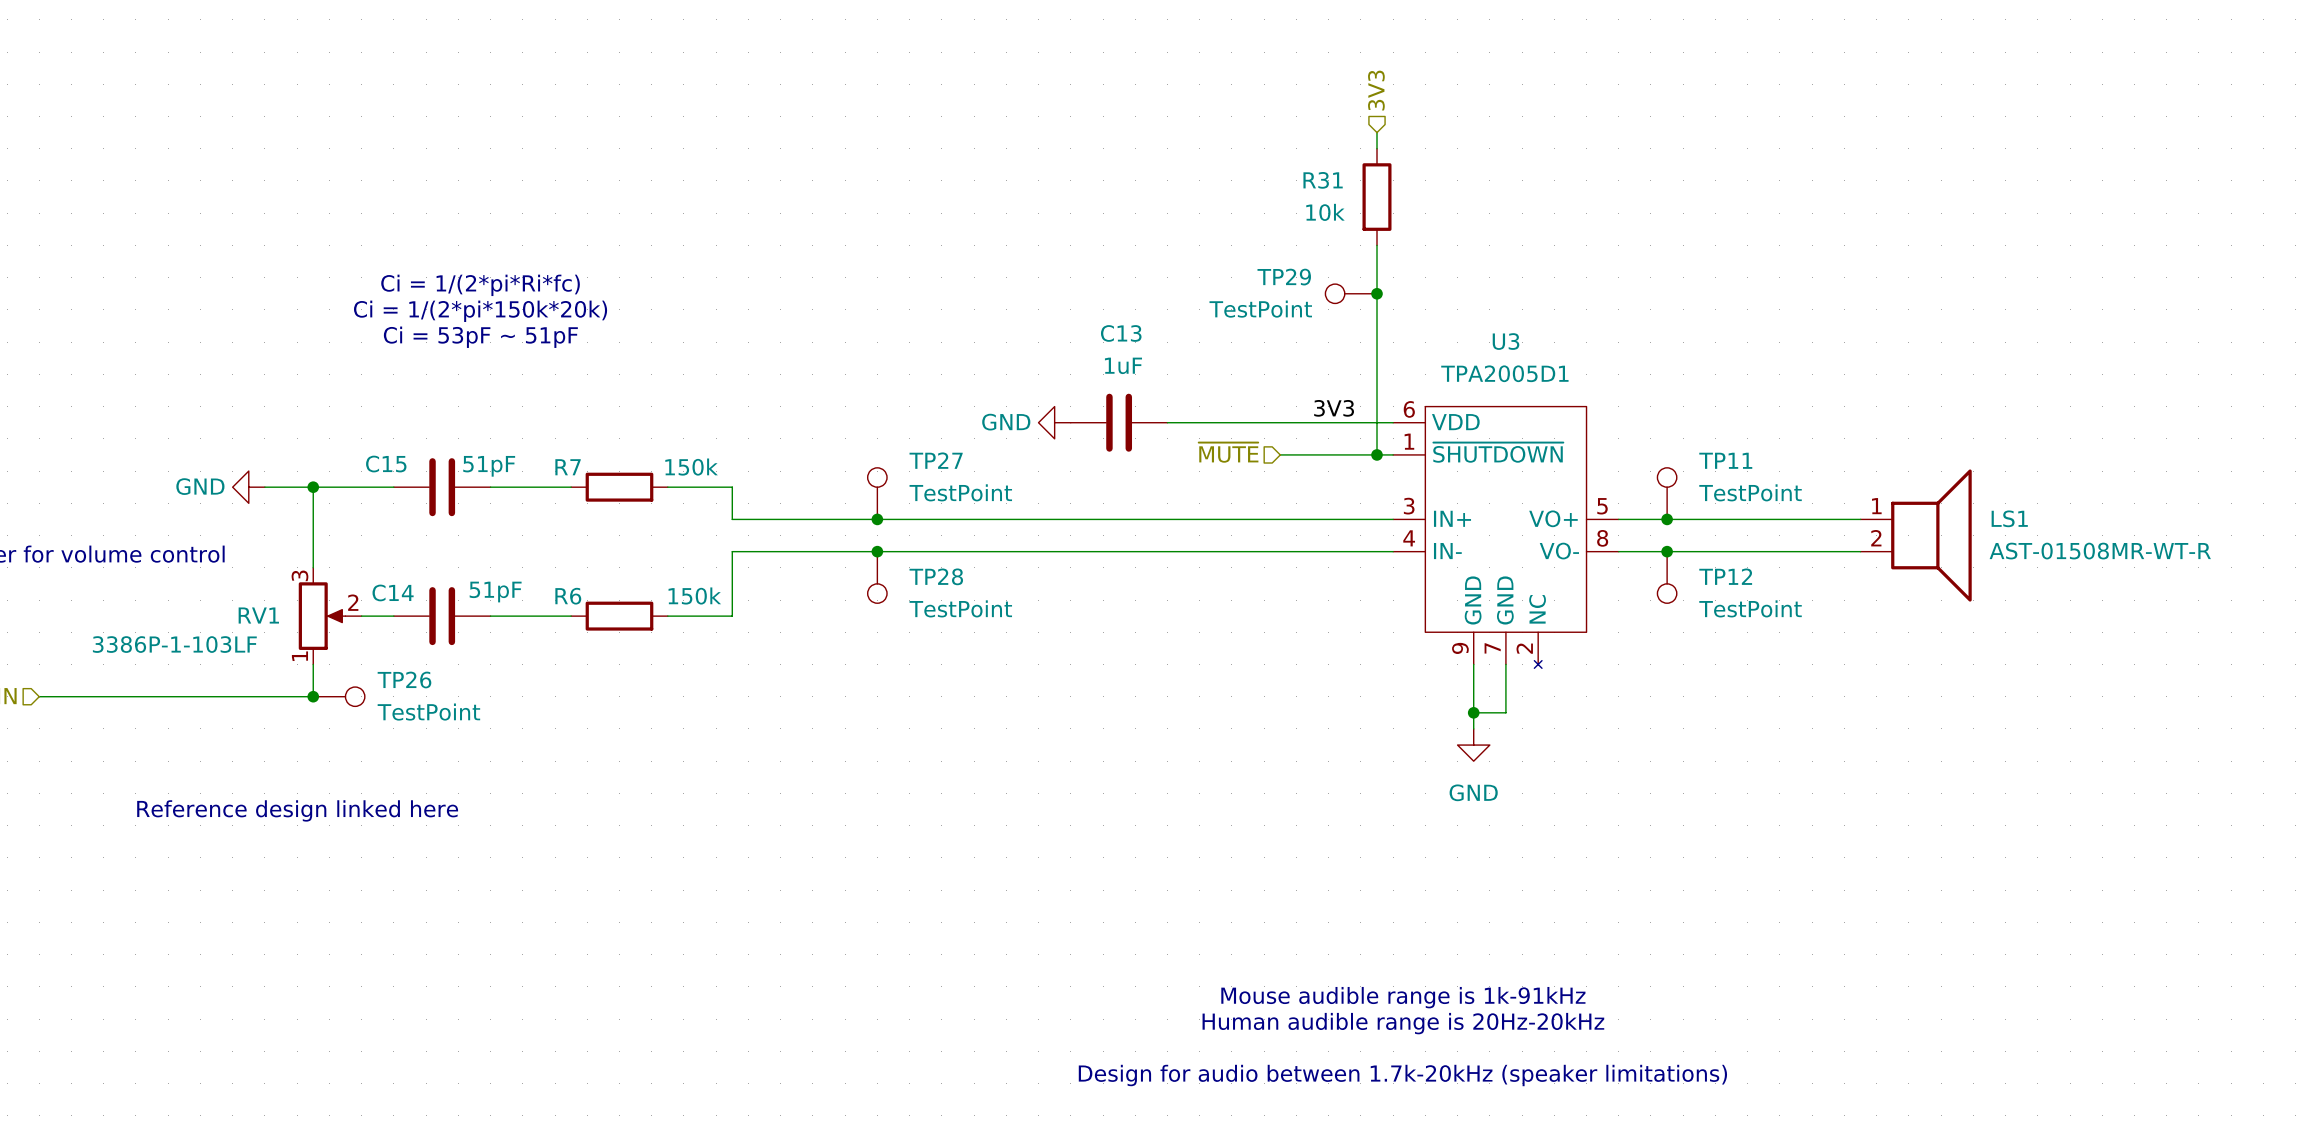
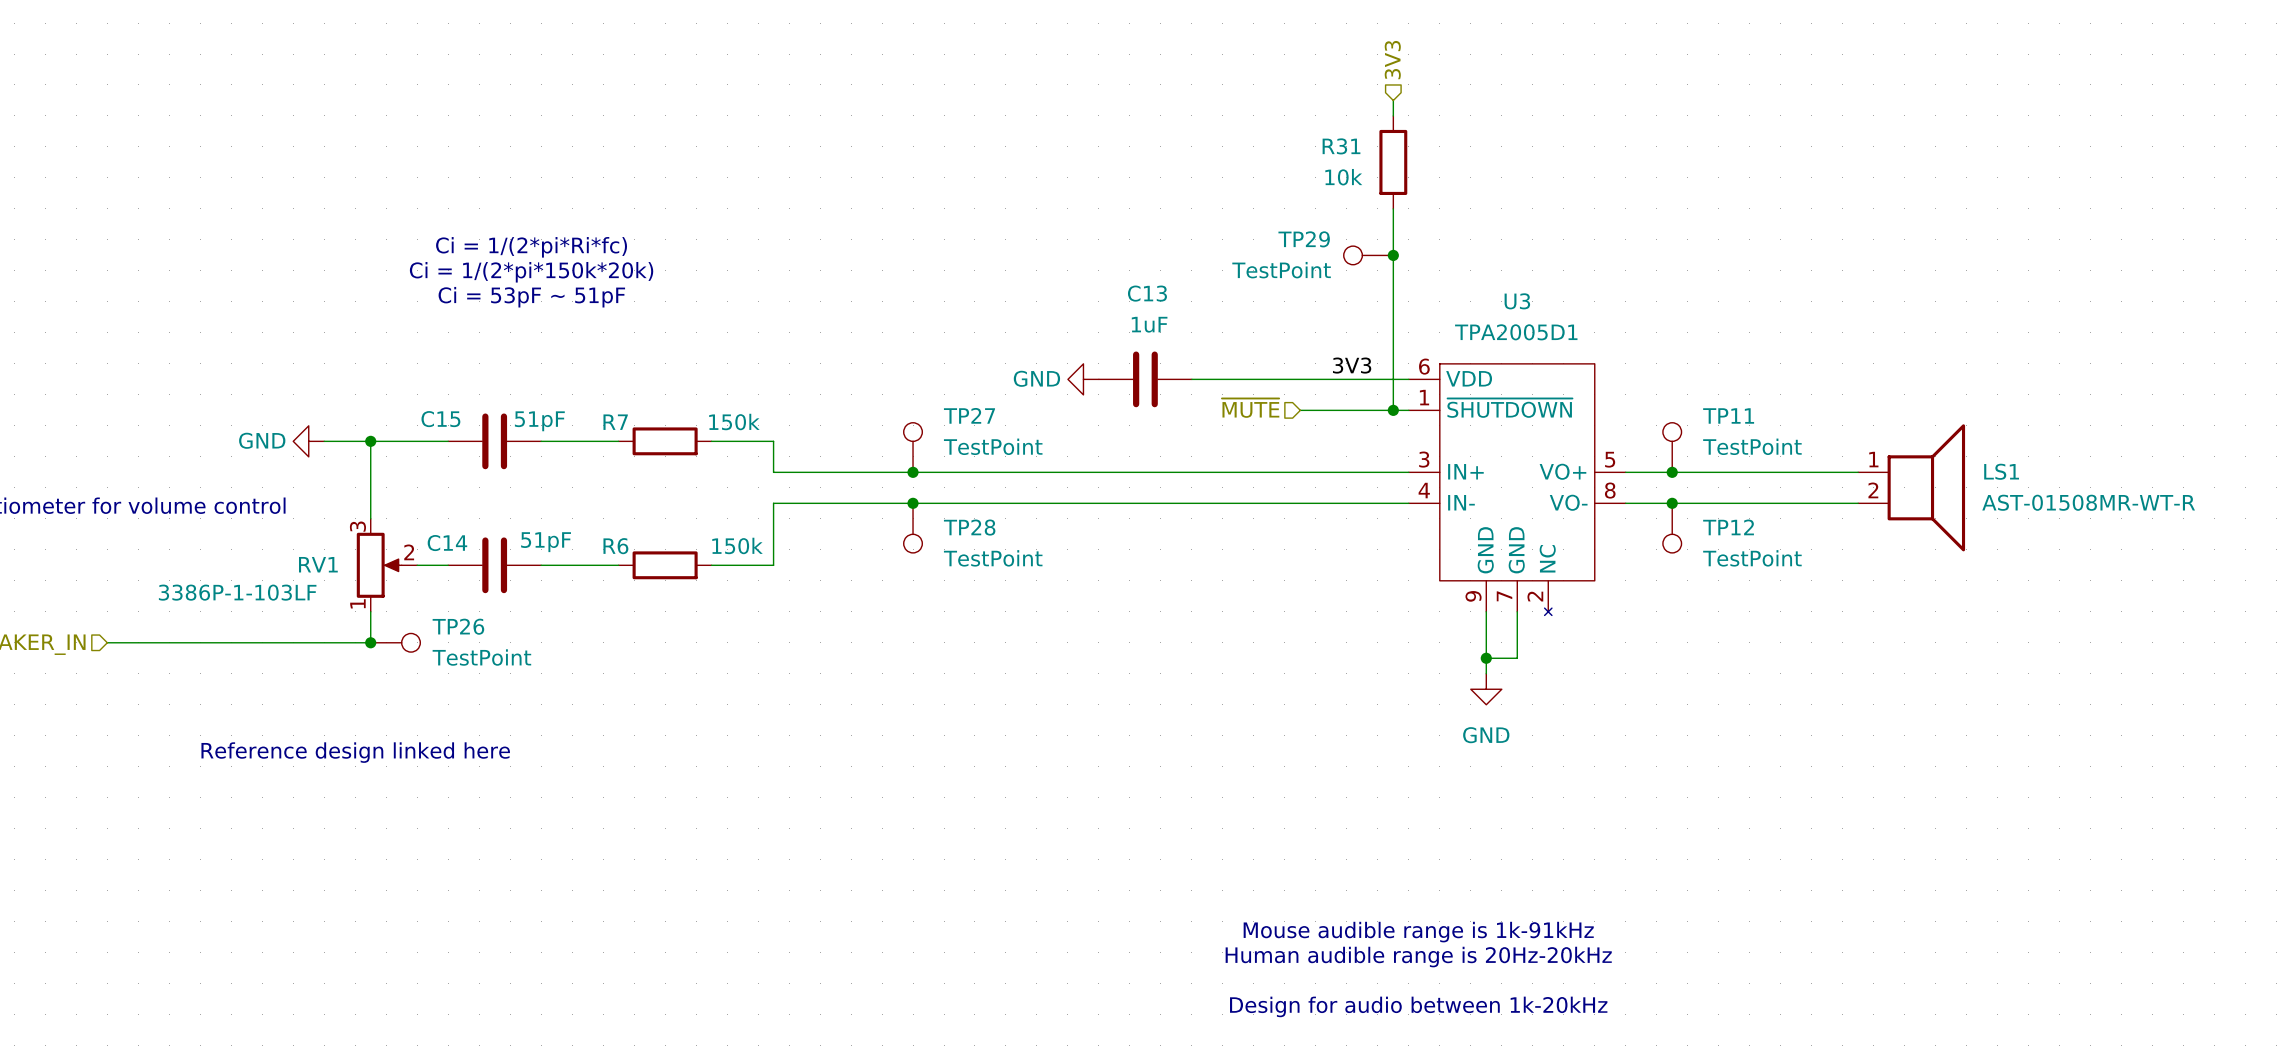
text: Design for audio between 1.7k-20kHz (speaker limitations) (1402, 1075) -> Design for audio between 1k-20kHz (1418, 1006)

